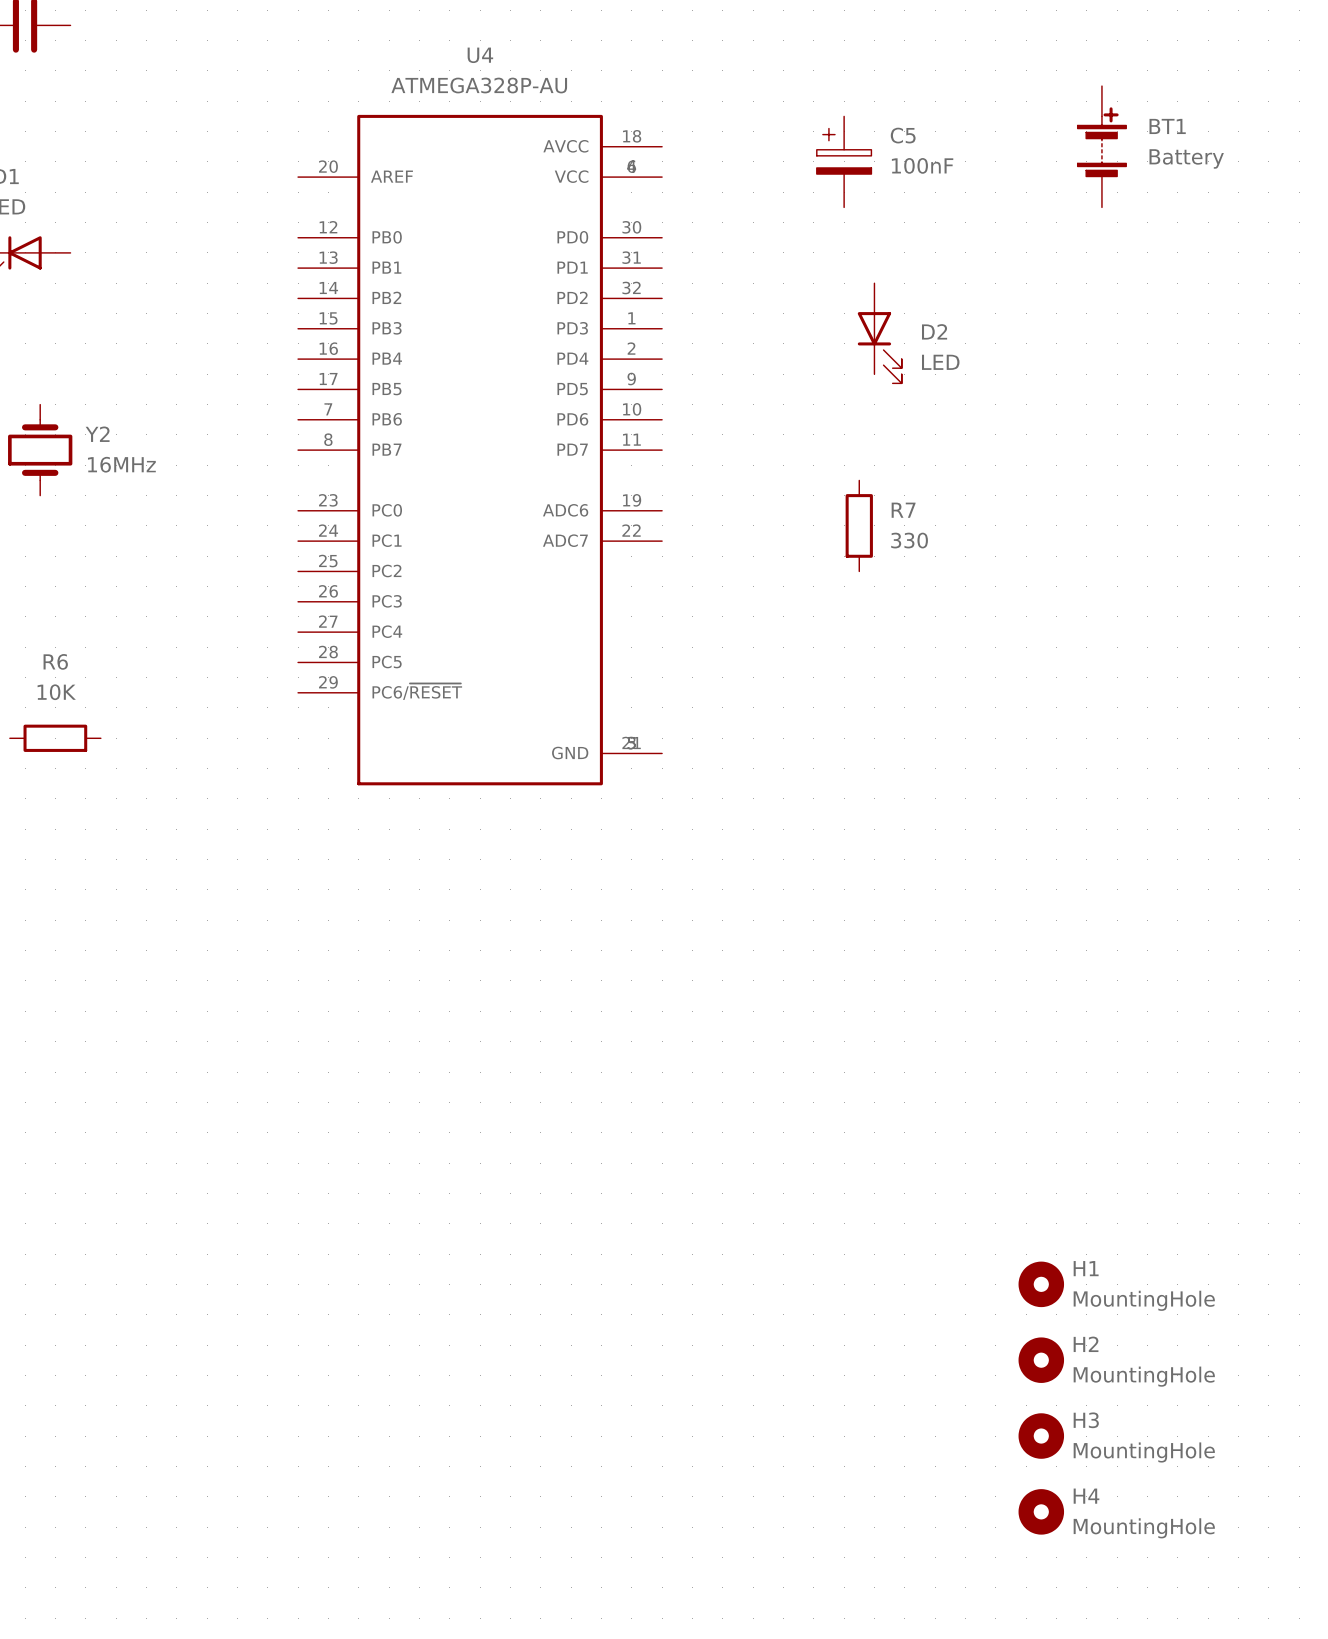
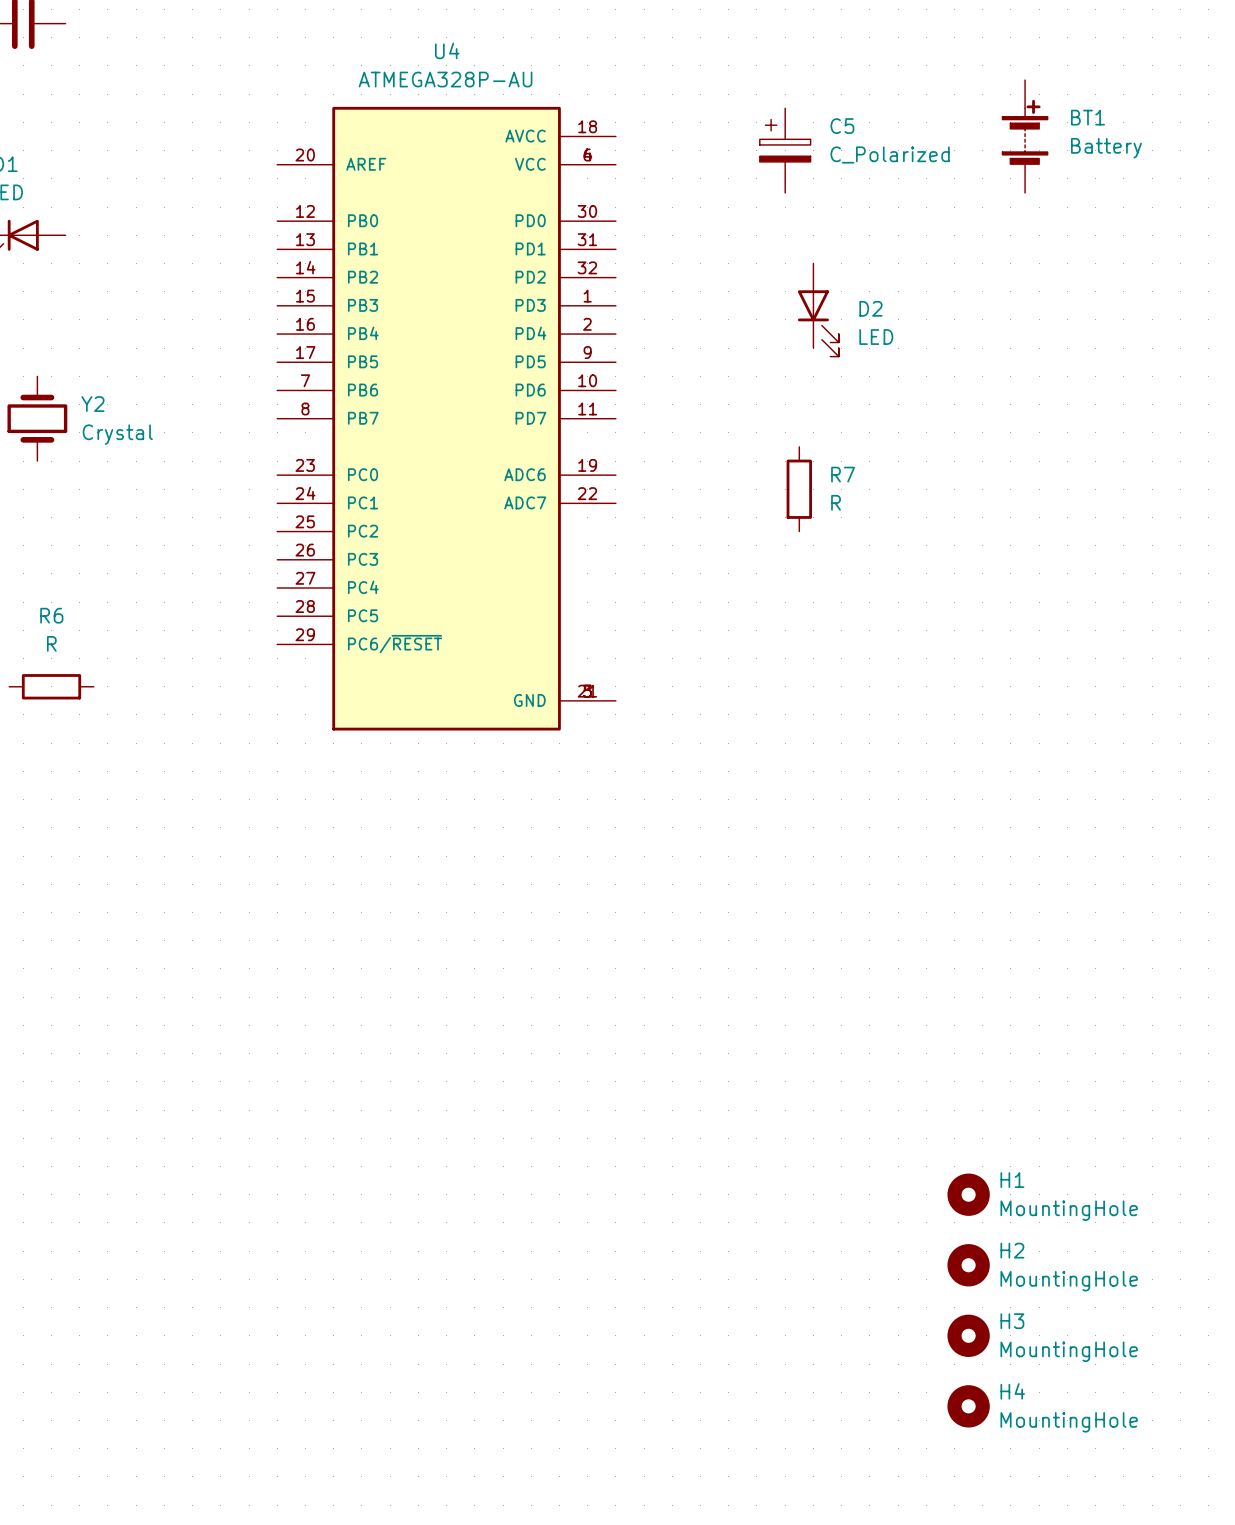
C5 value: 100nF (922, 165) -> C_Polarized (890, 154)
Y2 value: 16MHz (121, 464) -> Crystal (117, 434)
R7 value: 330 (909, 540) -> R (836, 502)
R6 value: 10K (56, 692) -> R (51, 643)

